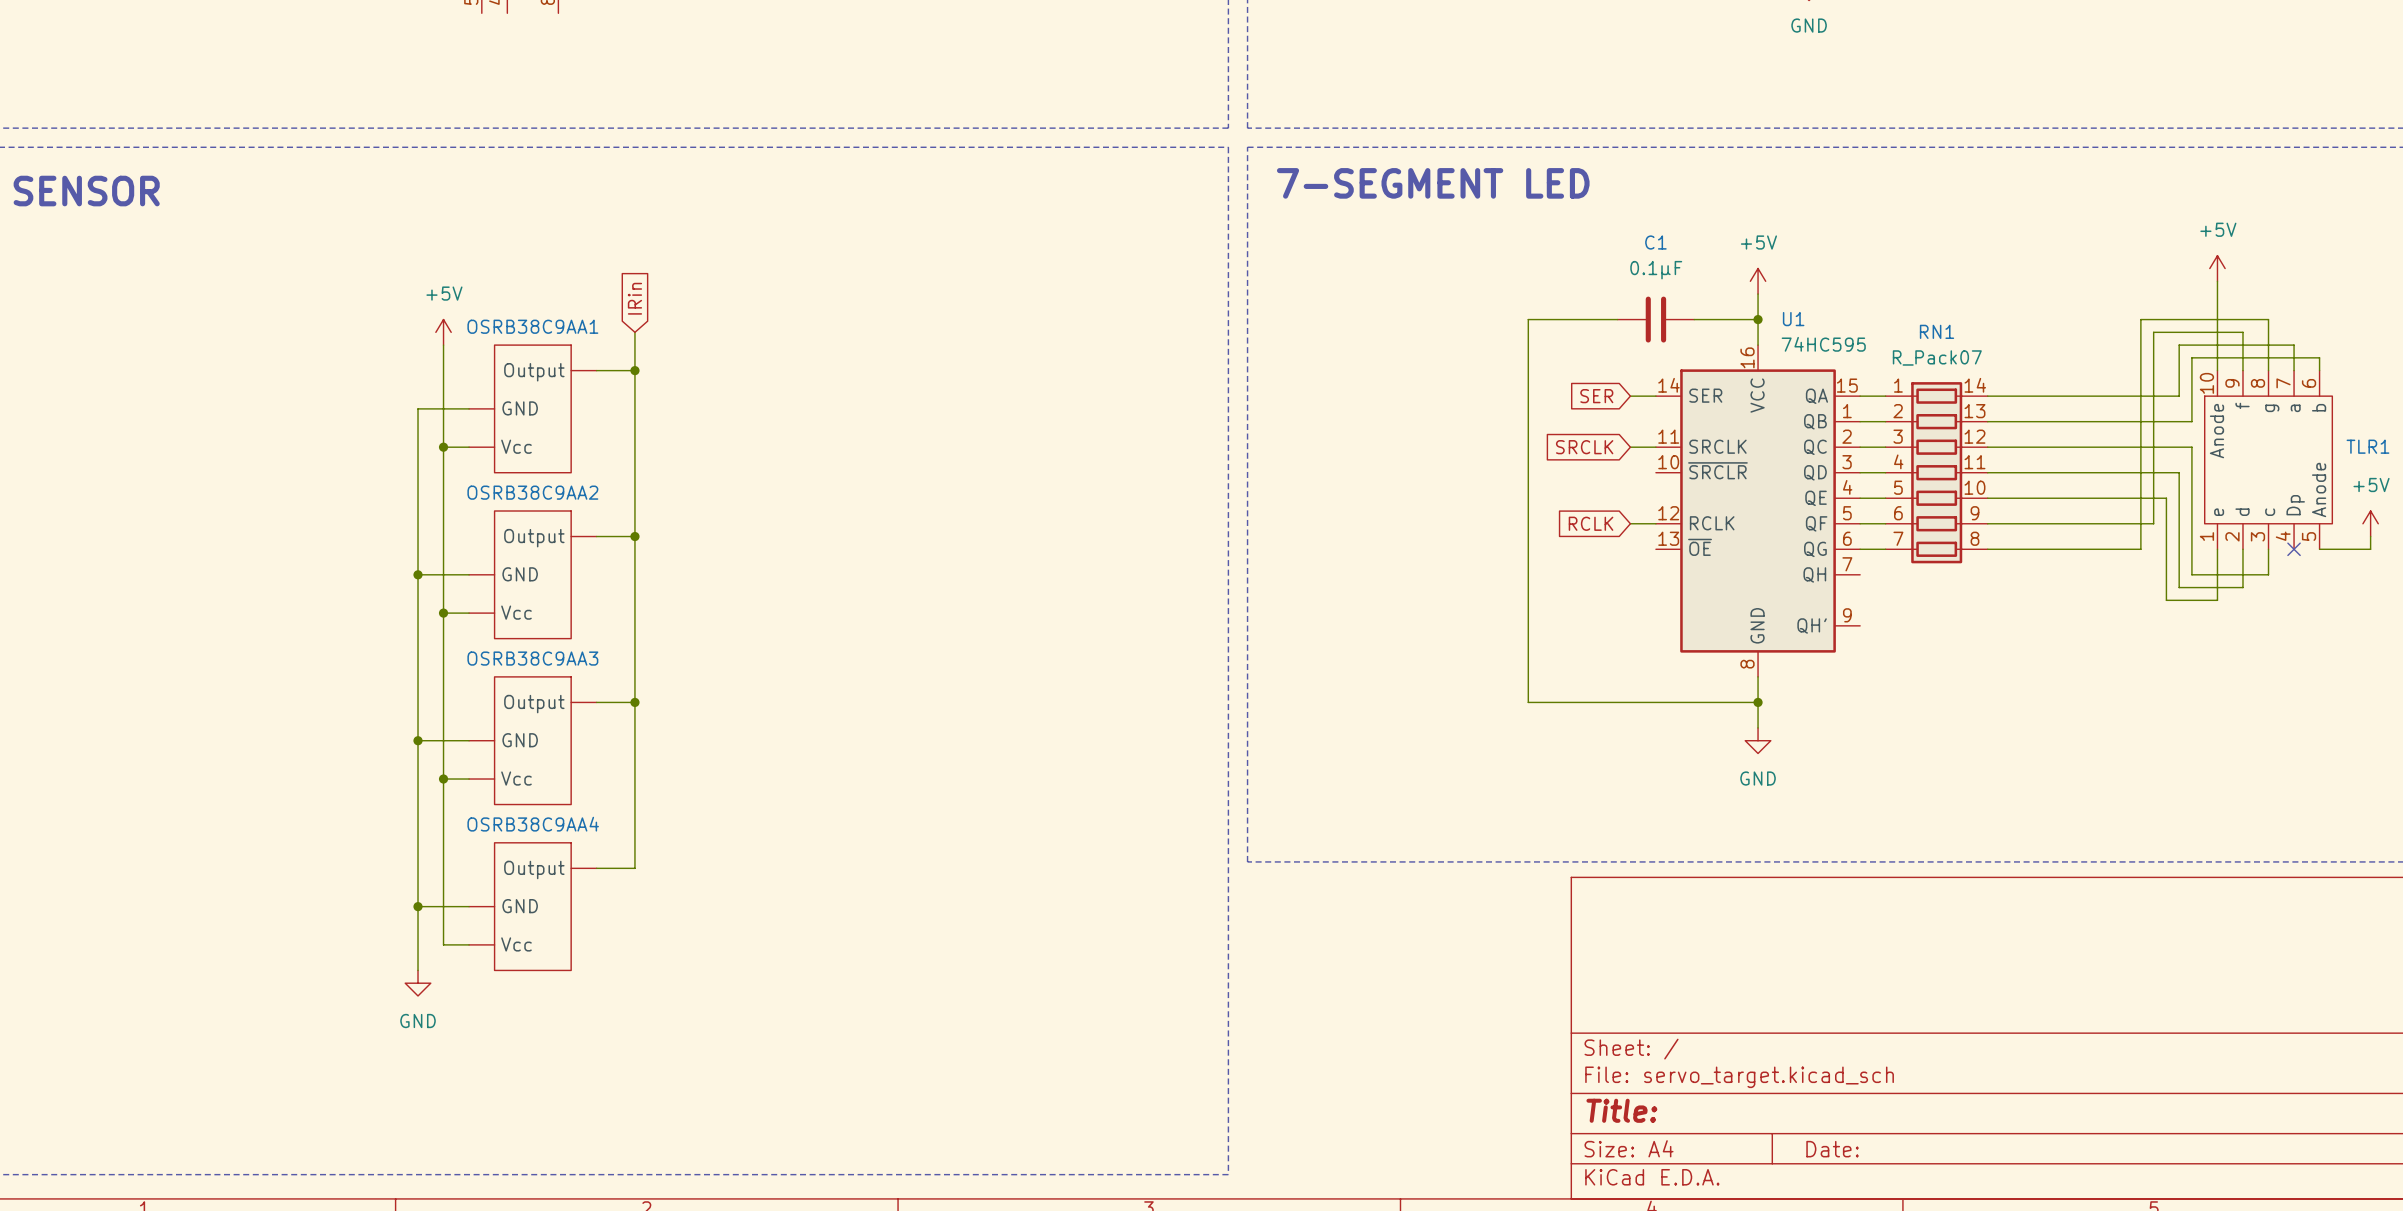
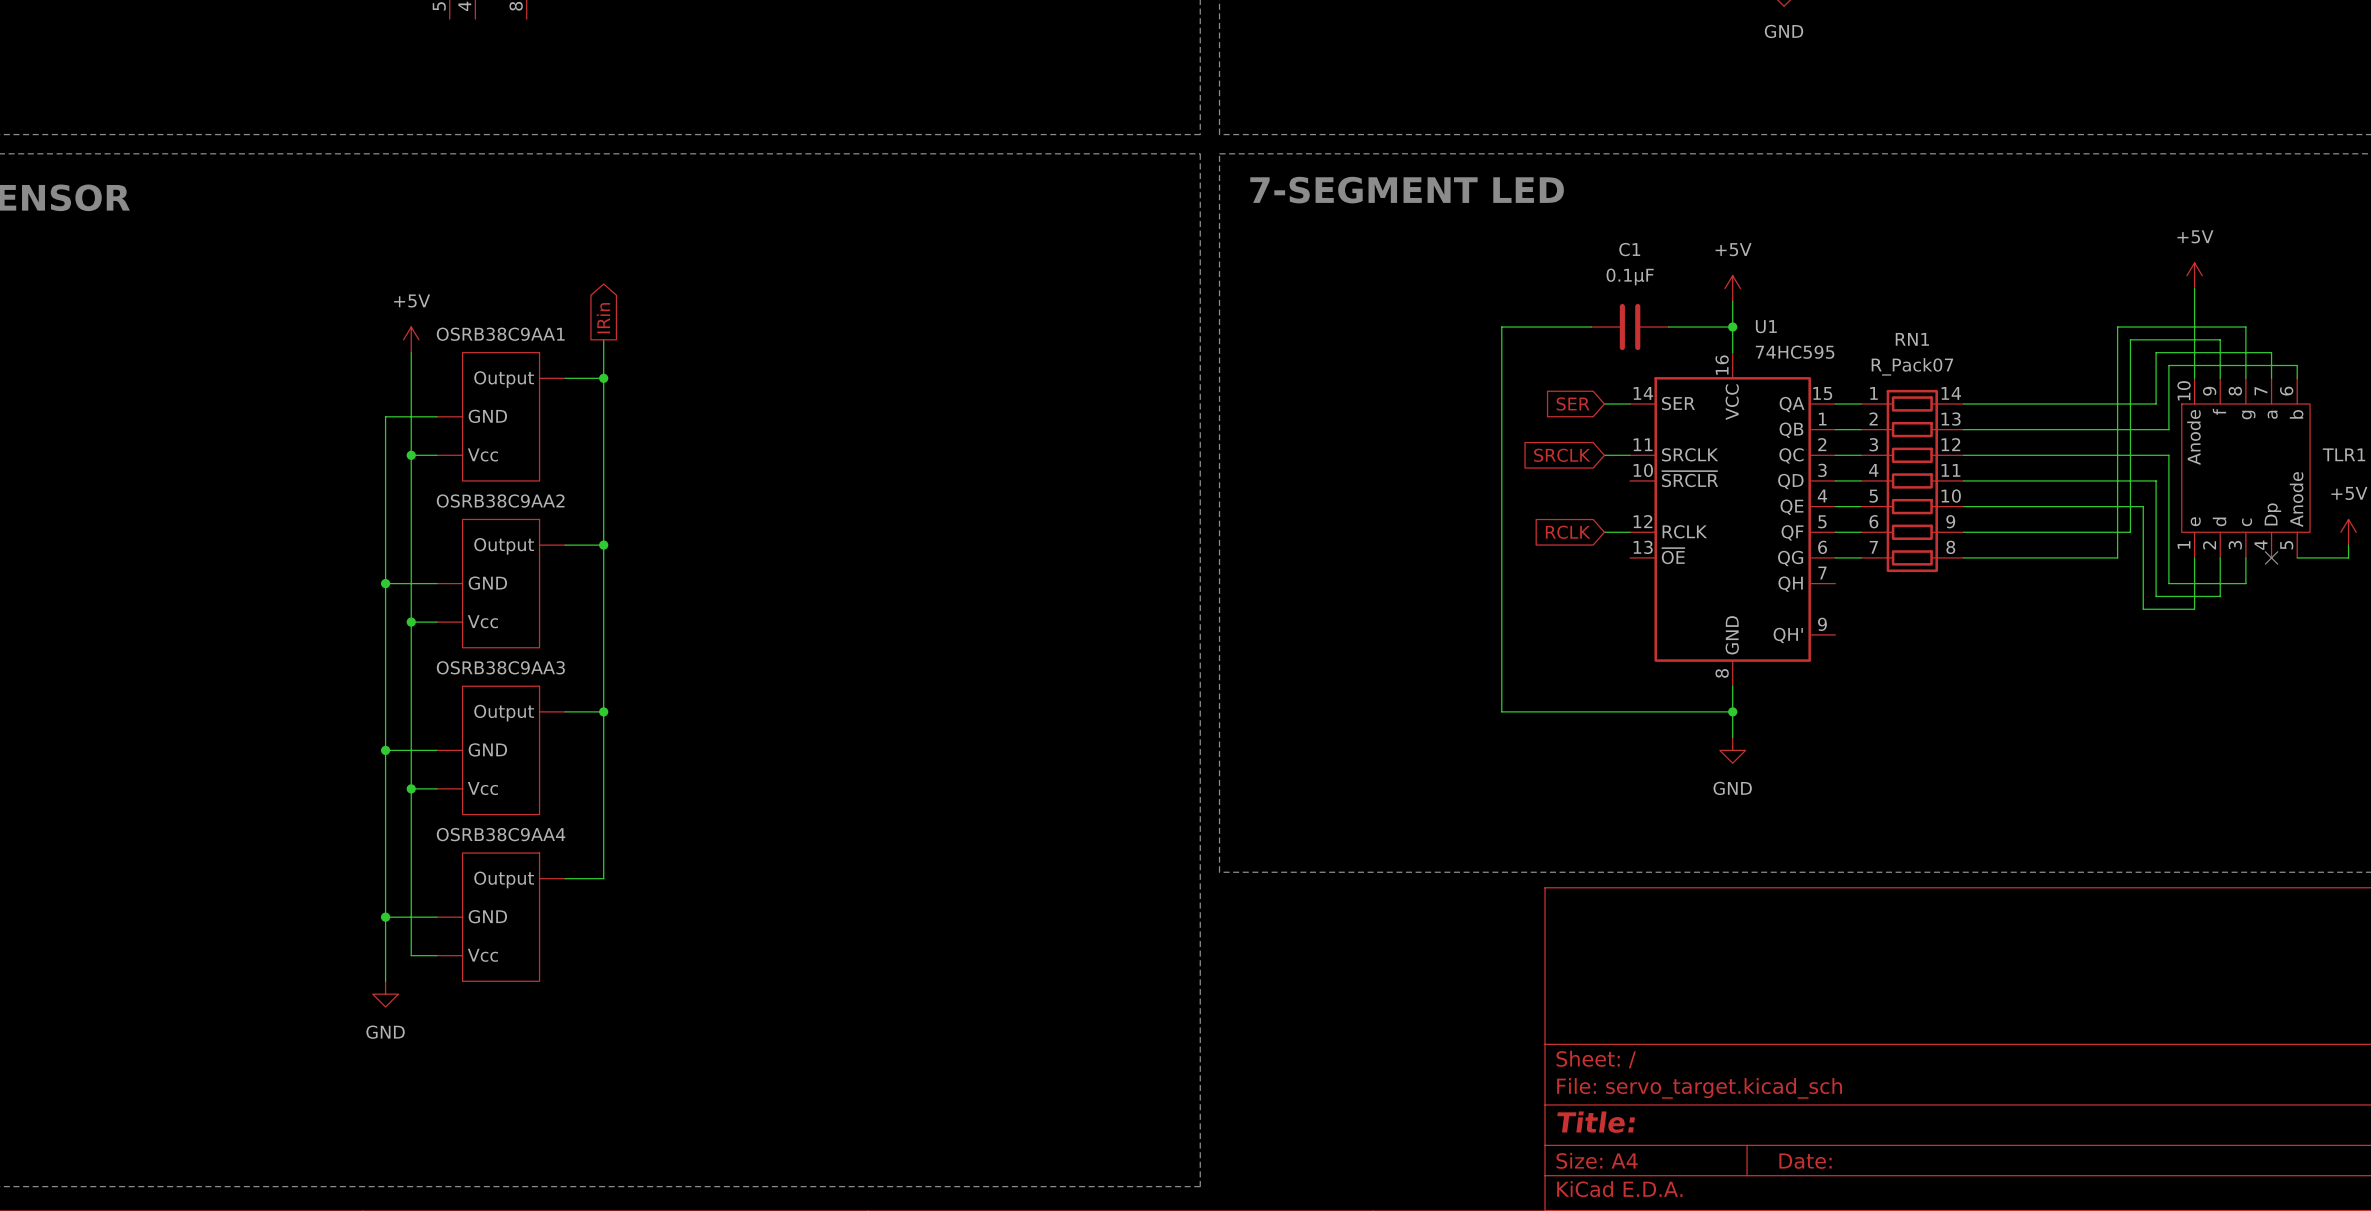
global label shape: input (634, 298) -> output (603, 318)

